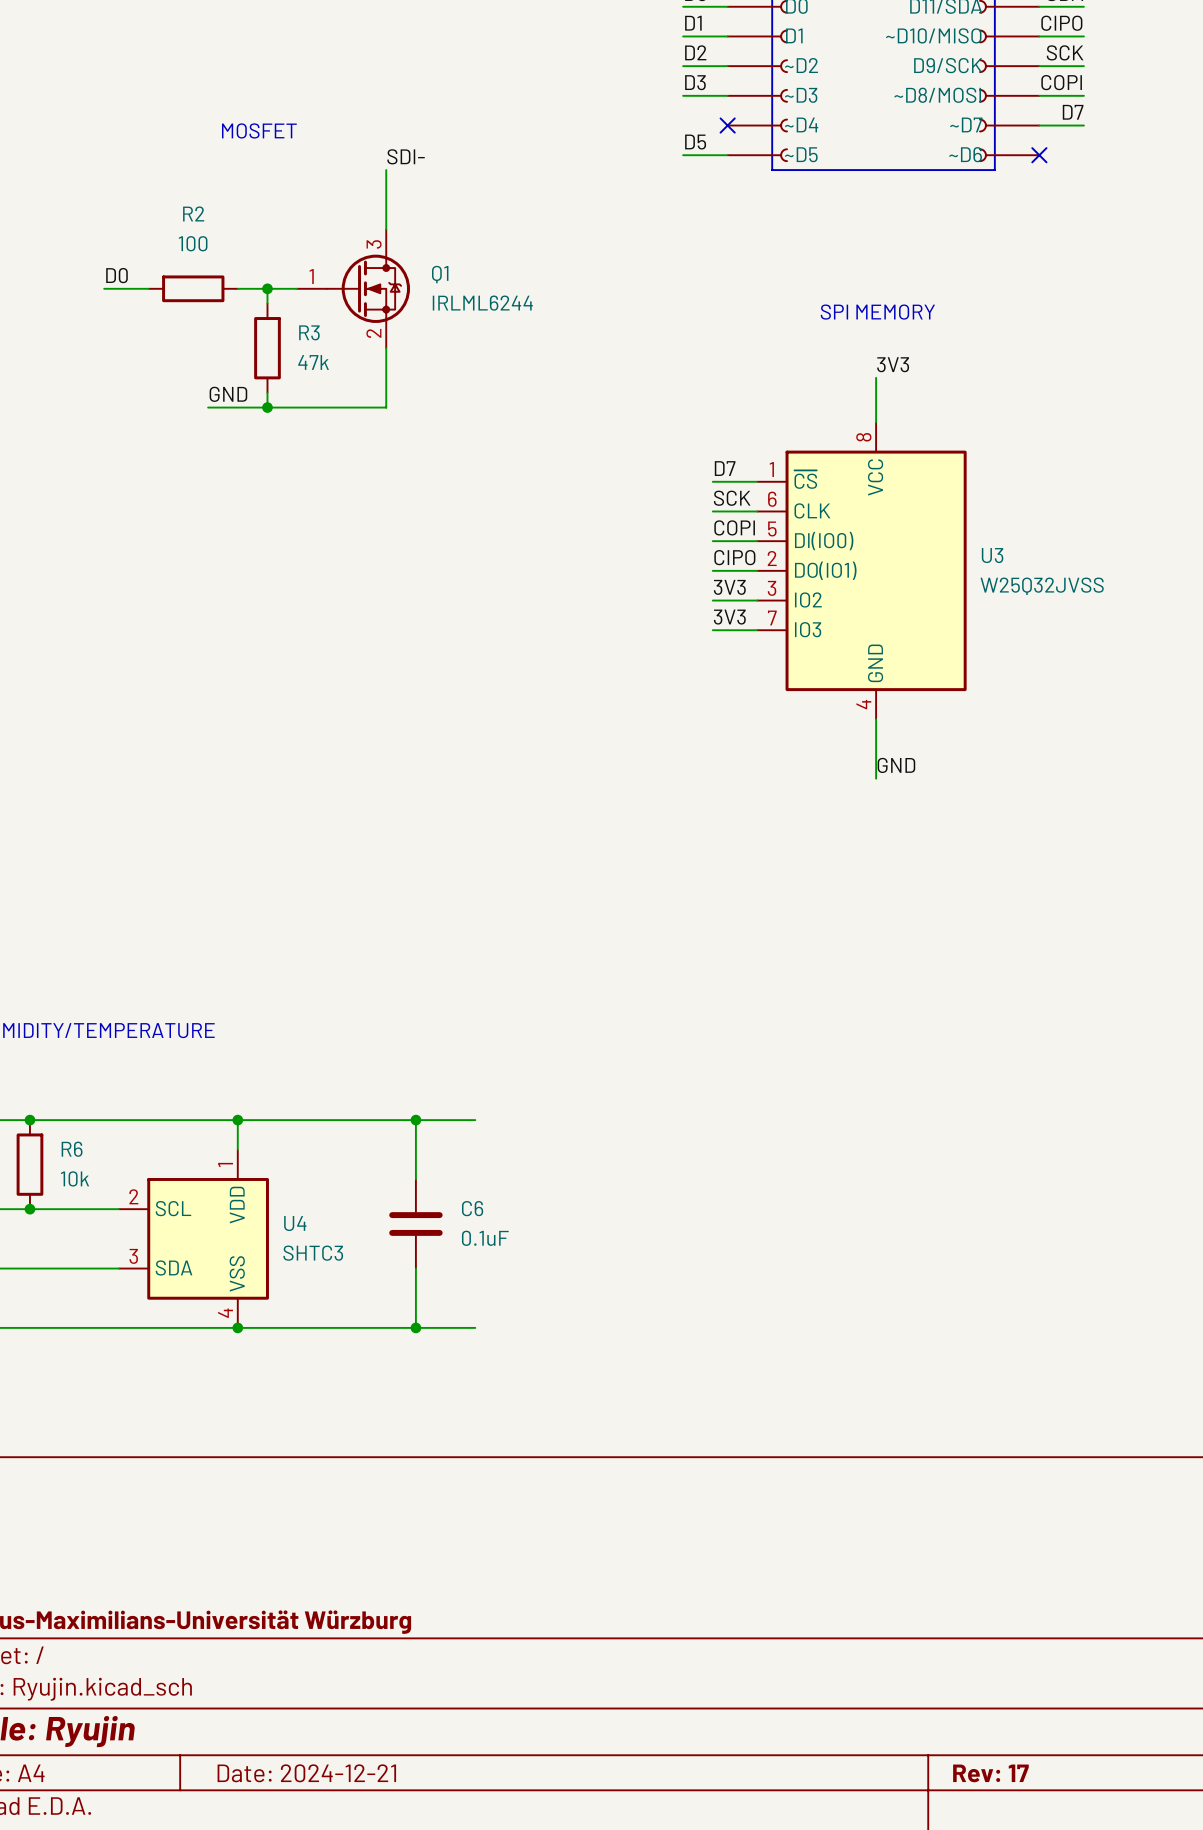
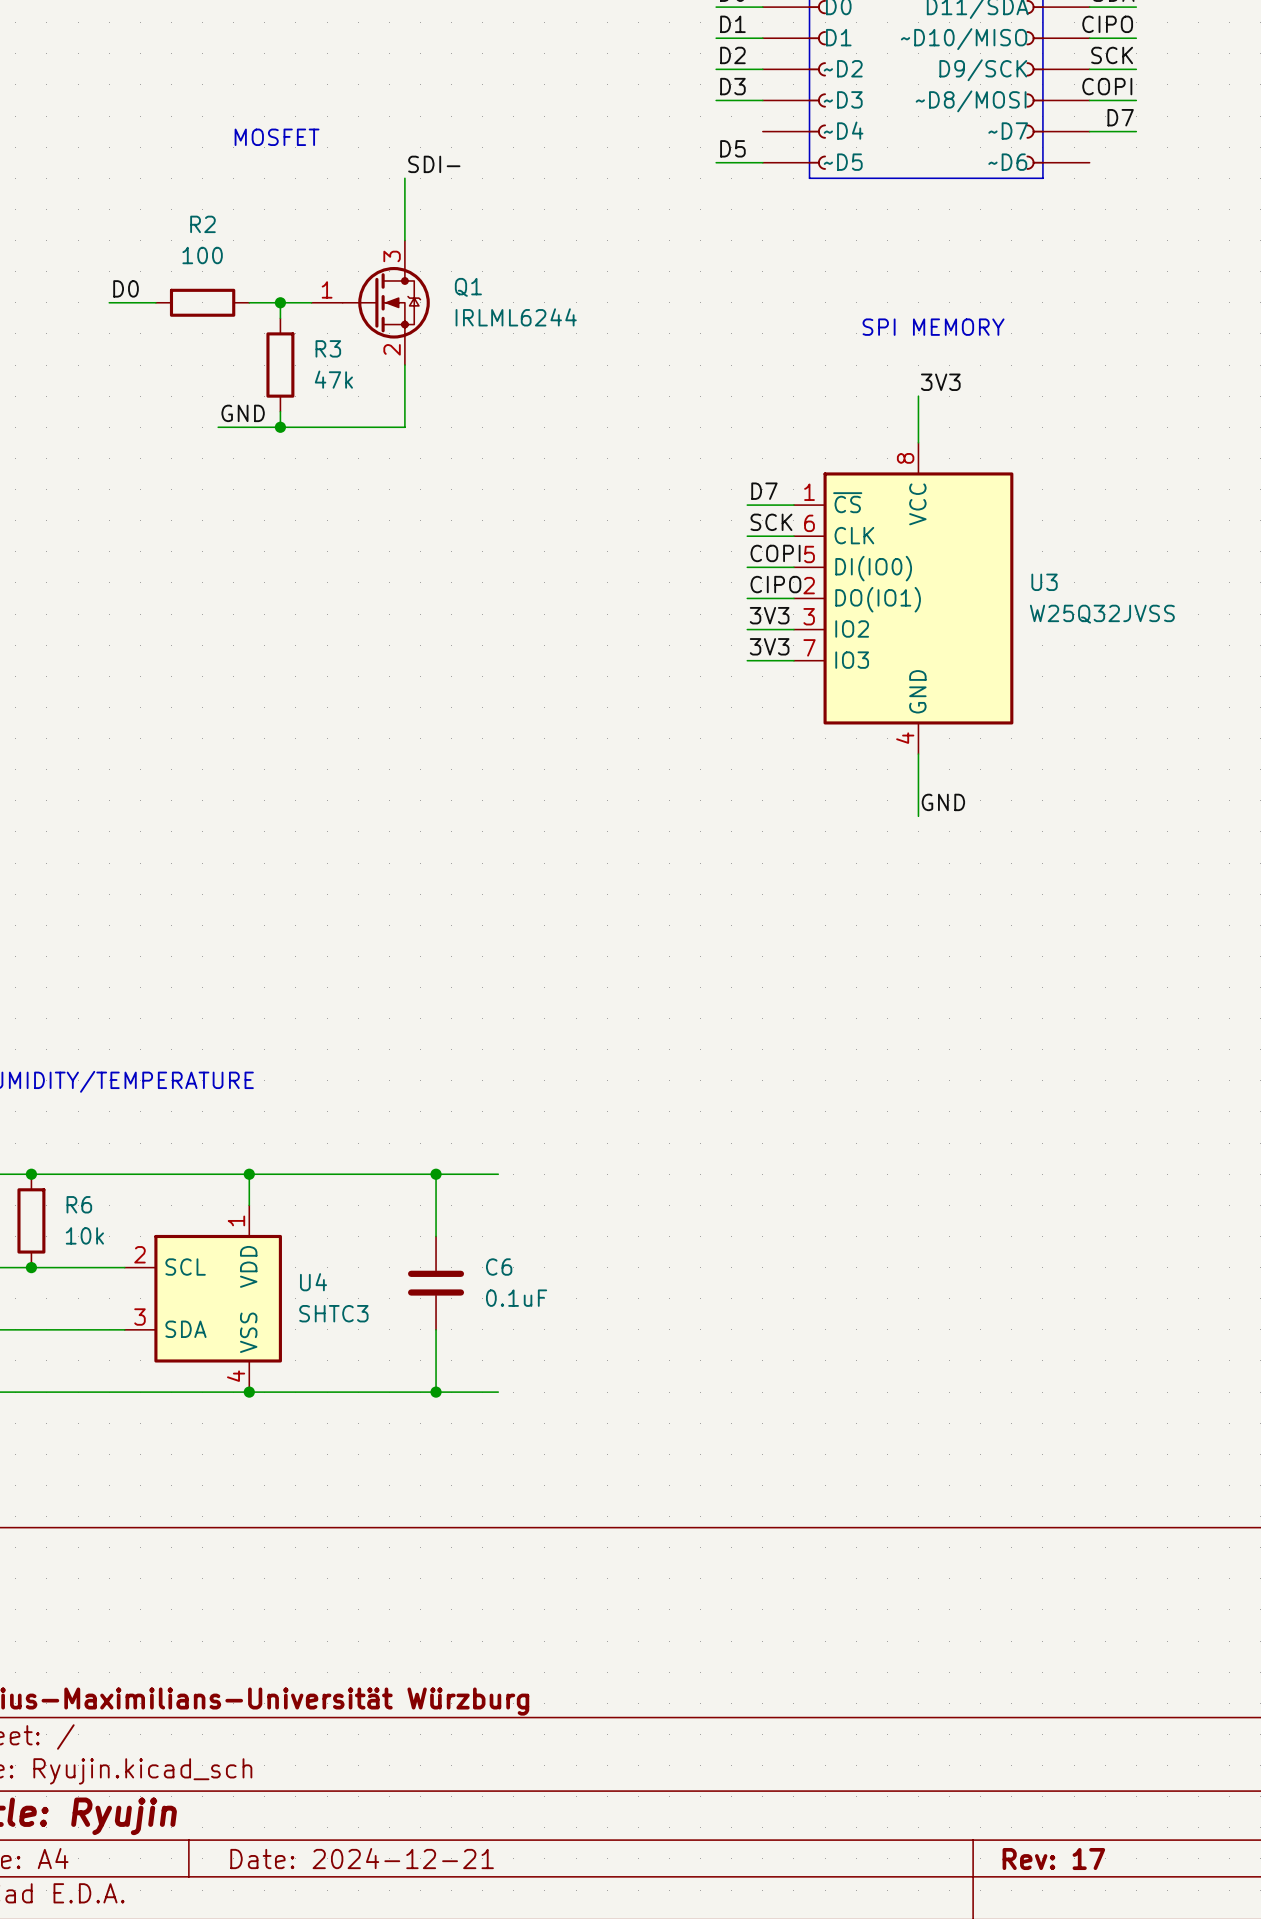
no-connect mark: (727, 125) -> none
no-connect mark: (1039, 155) -> none

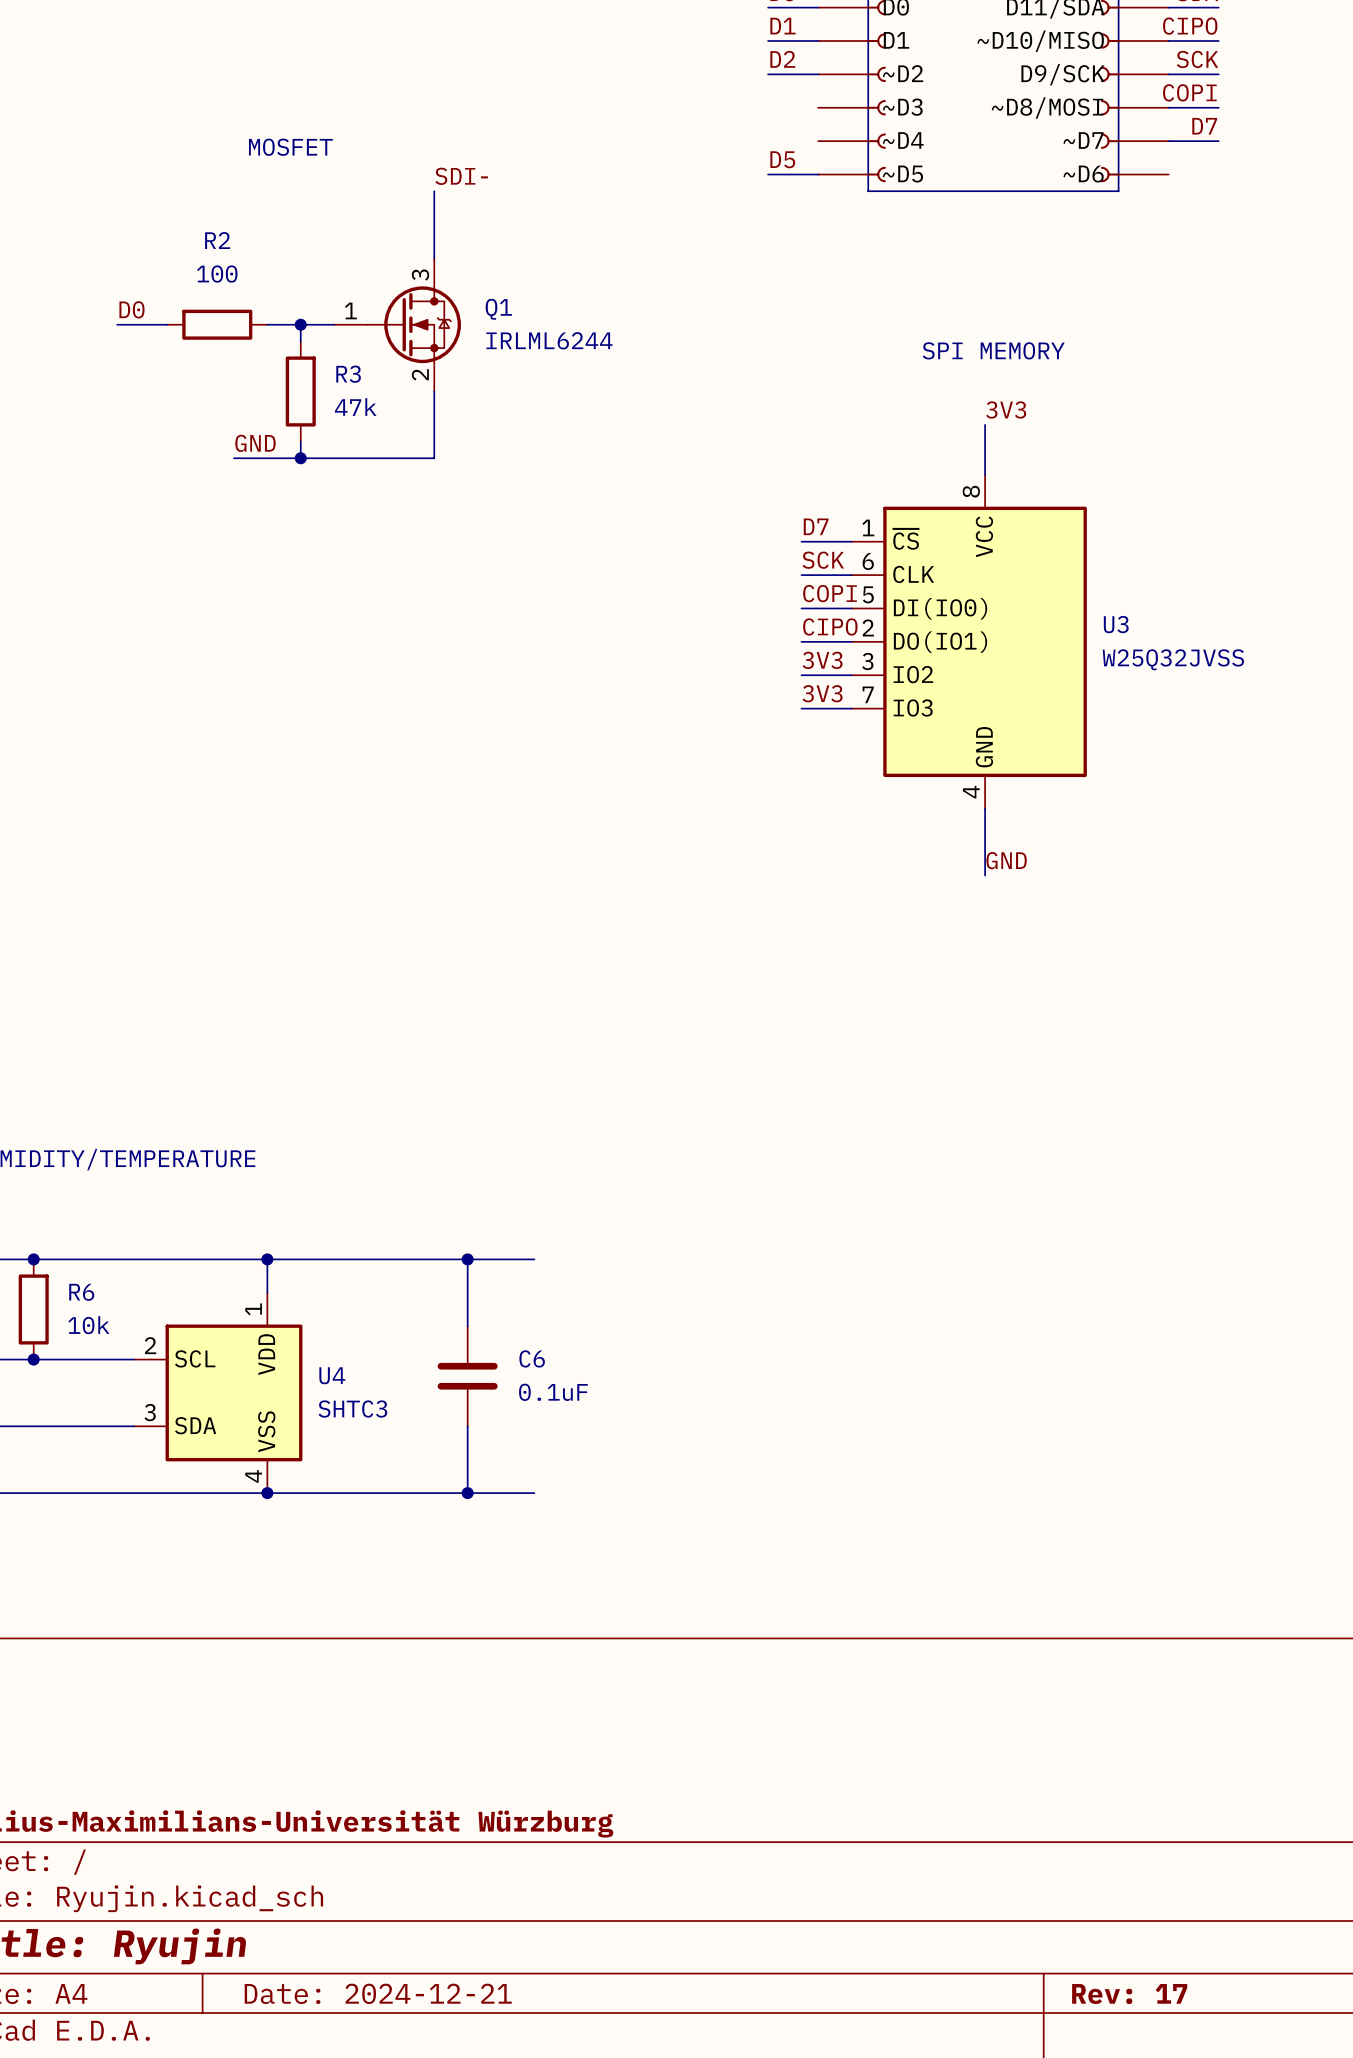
label: D3 (732, 86) -> none
wire: (716, 100) (762, 100) -> none

